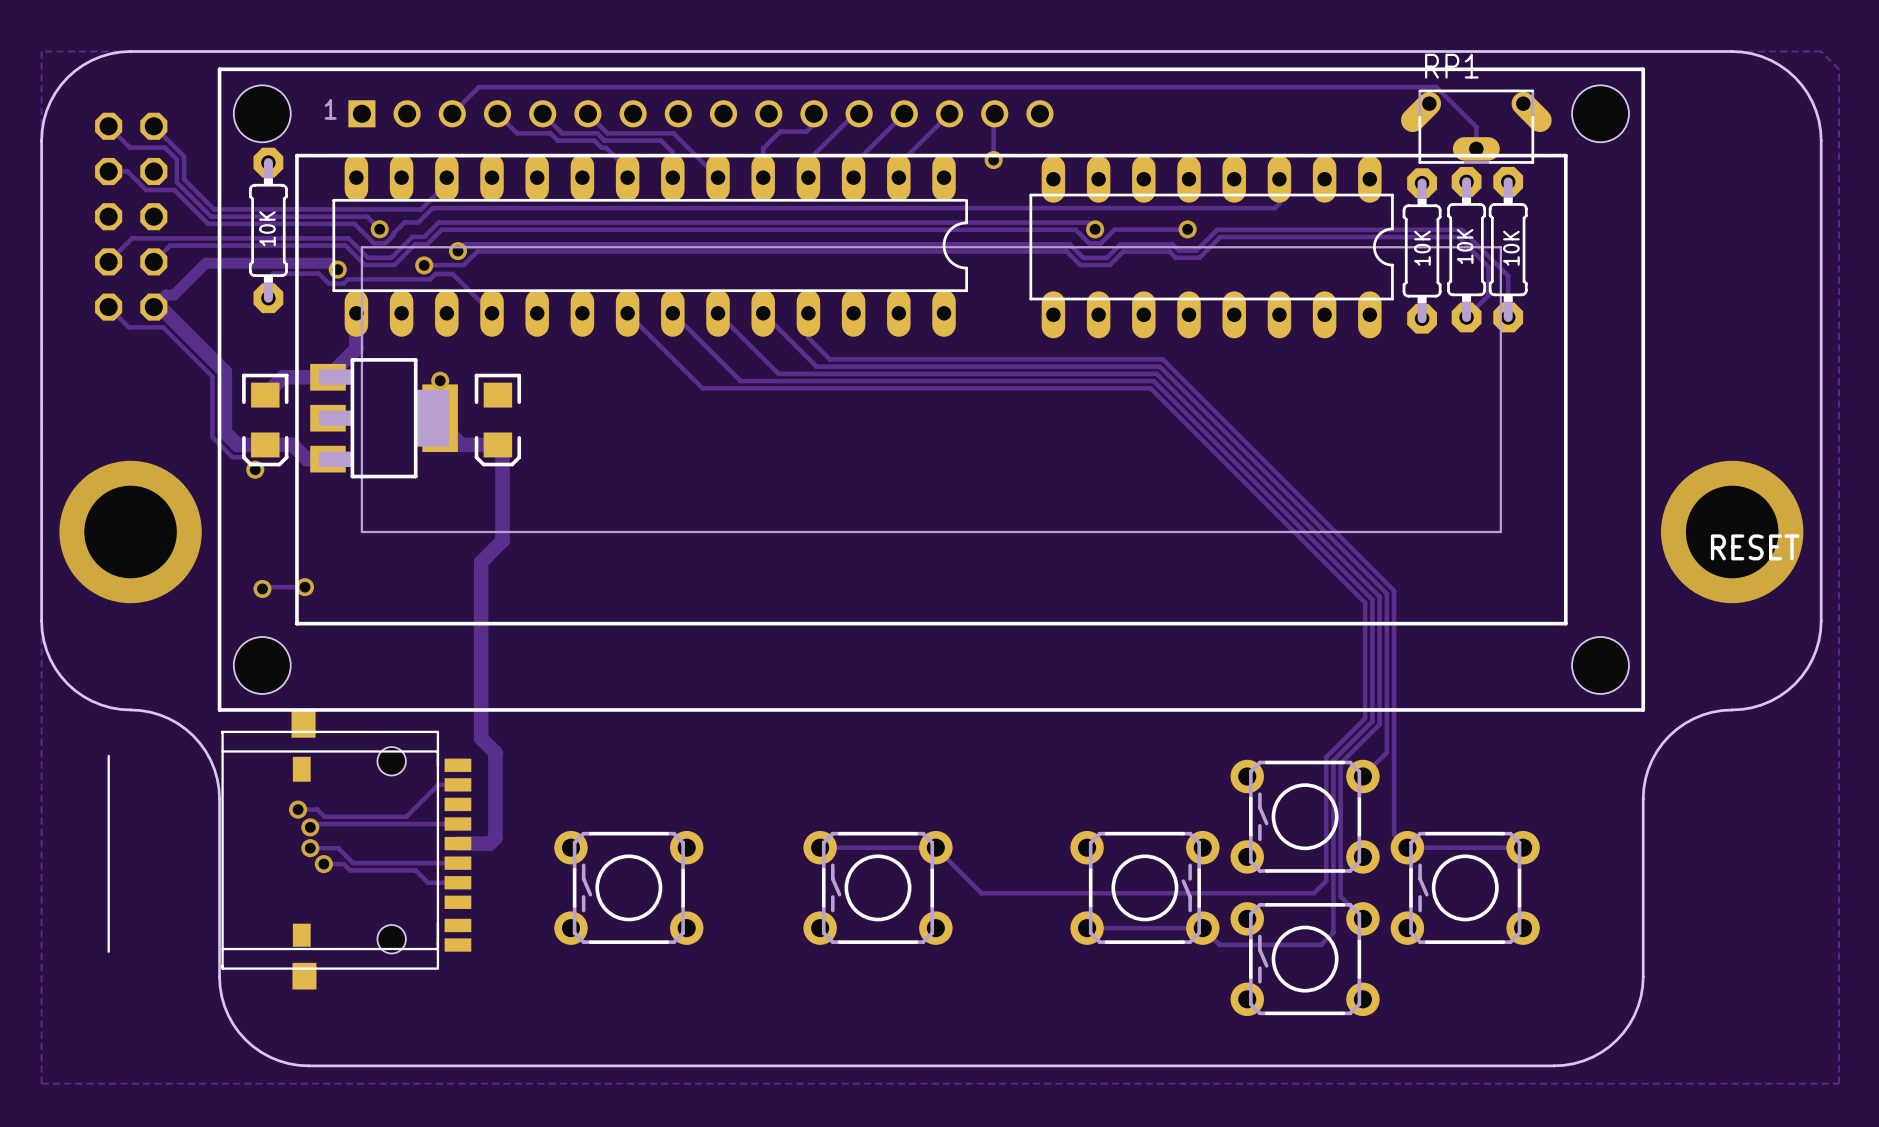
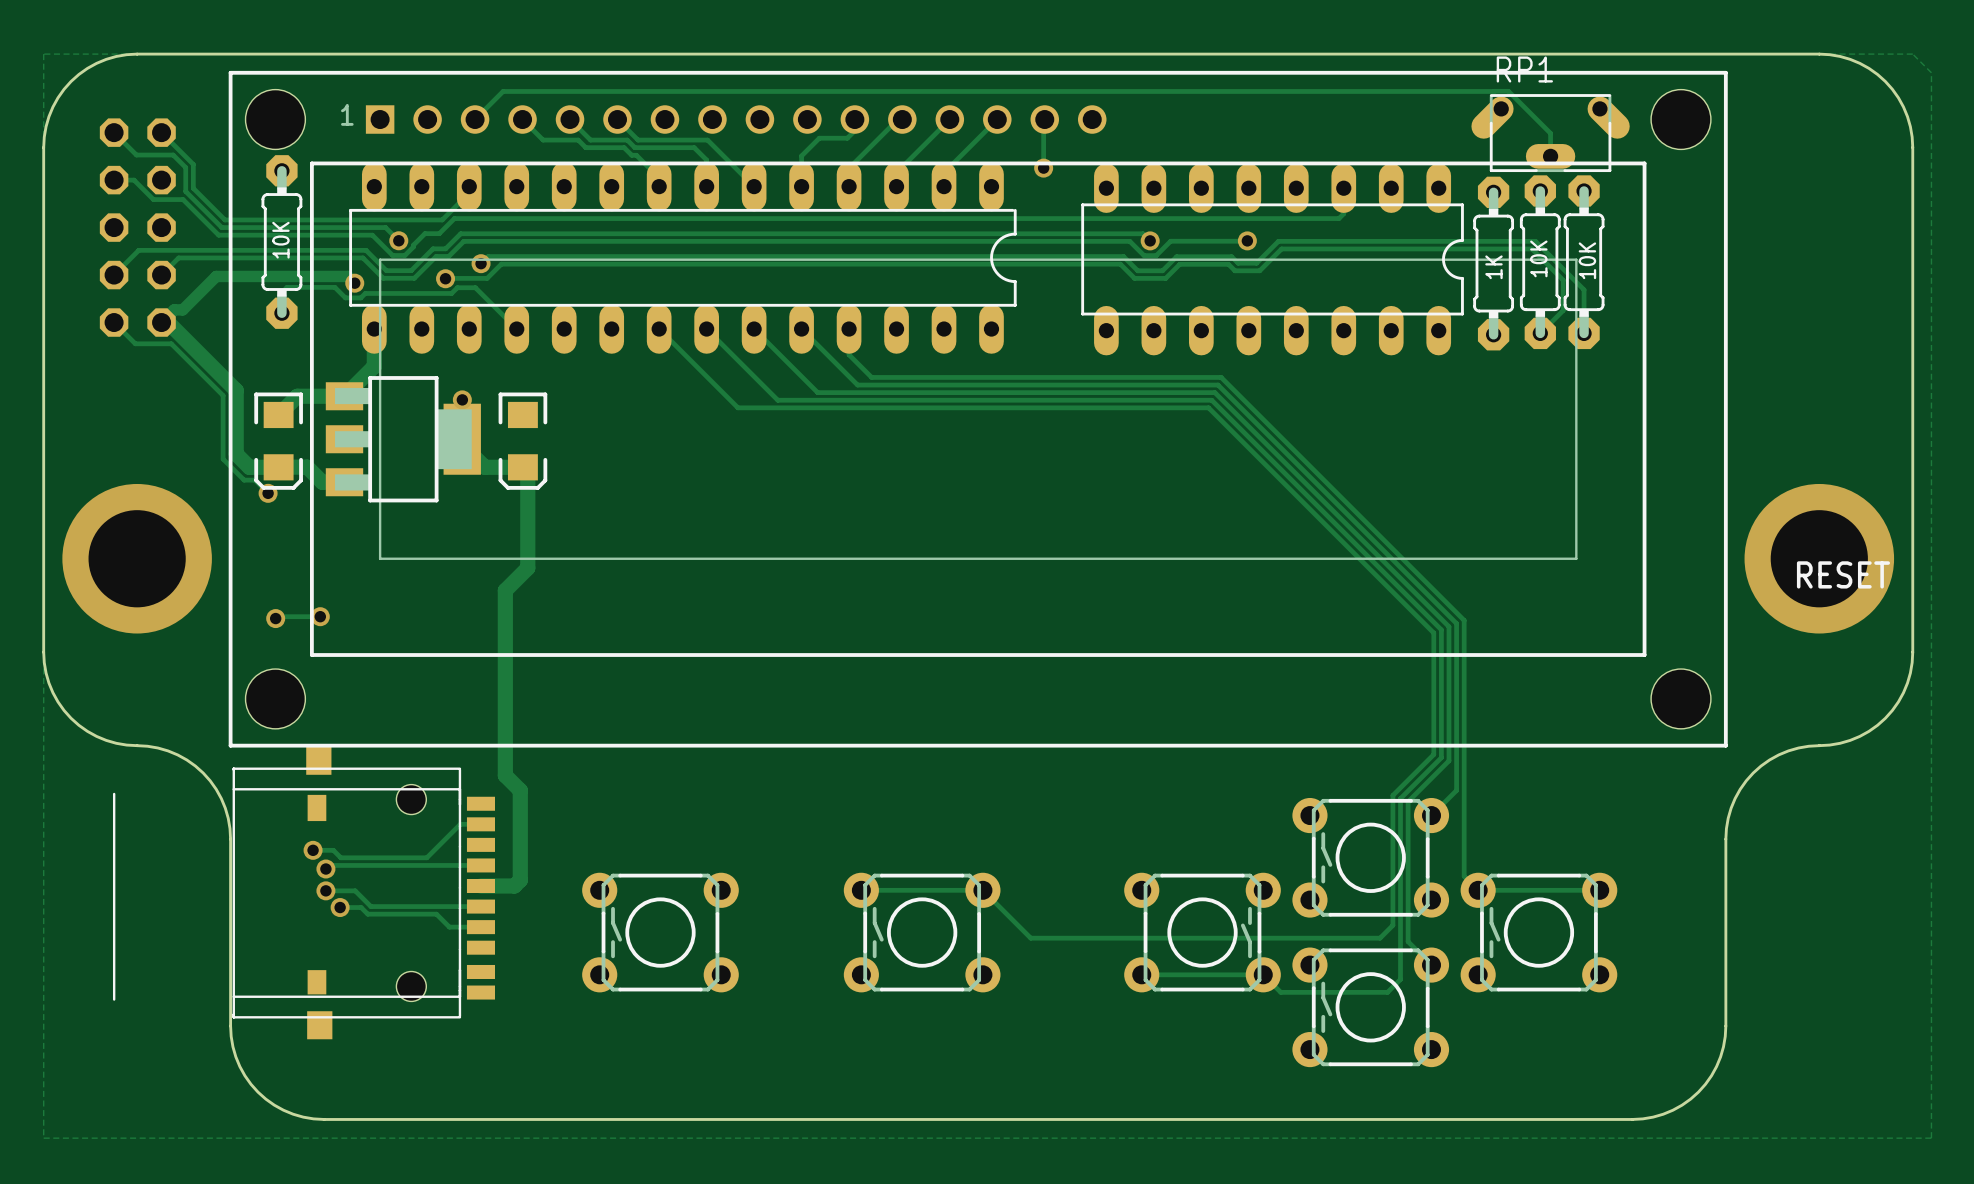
text: 10K (1422, 248) -> 1K (1493, 267)

